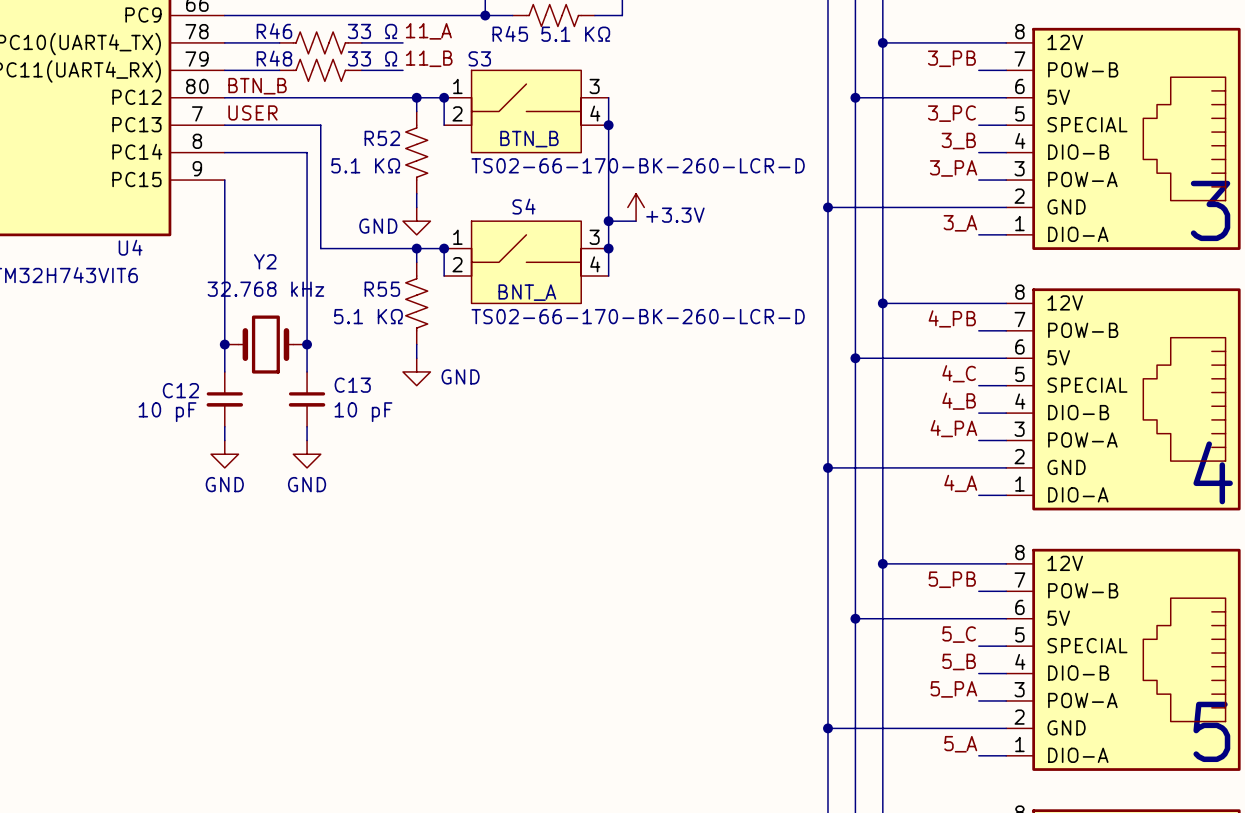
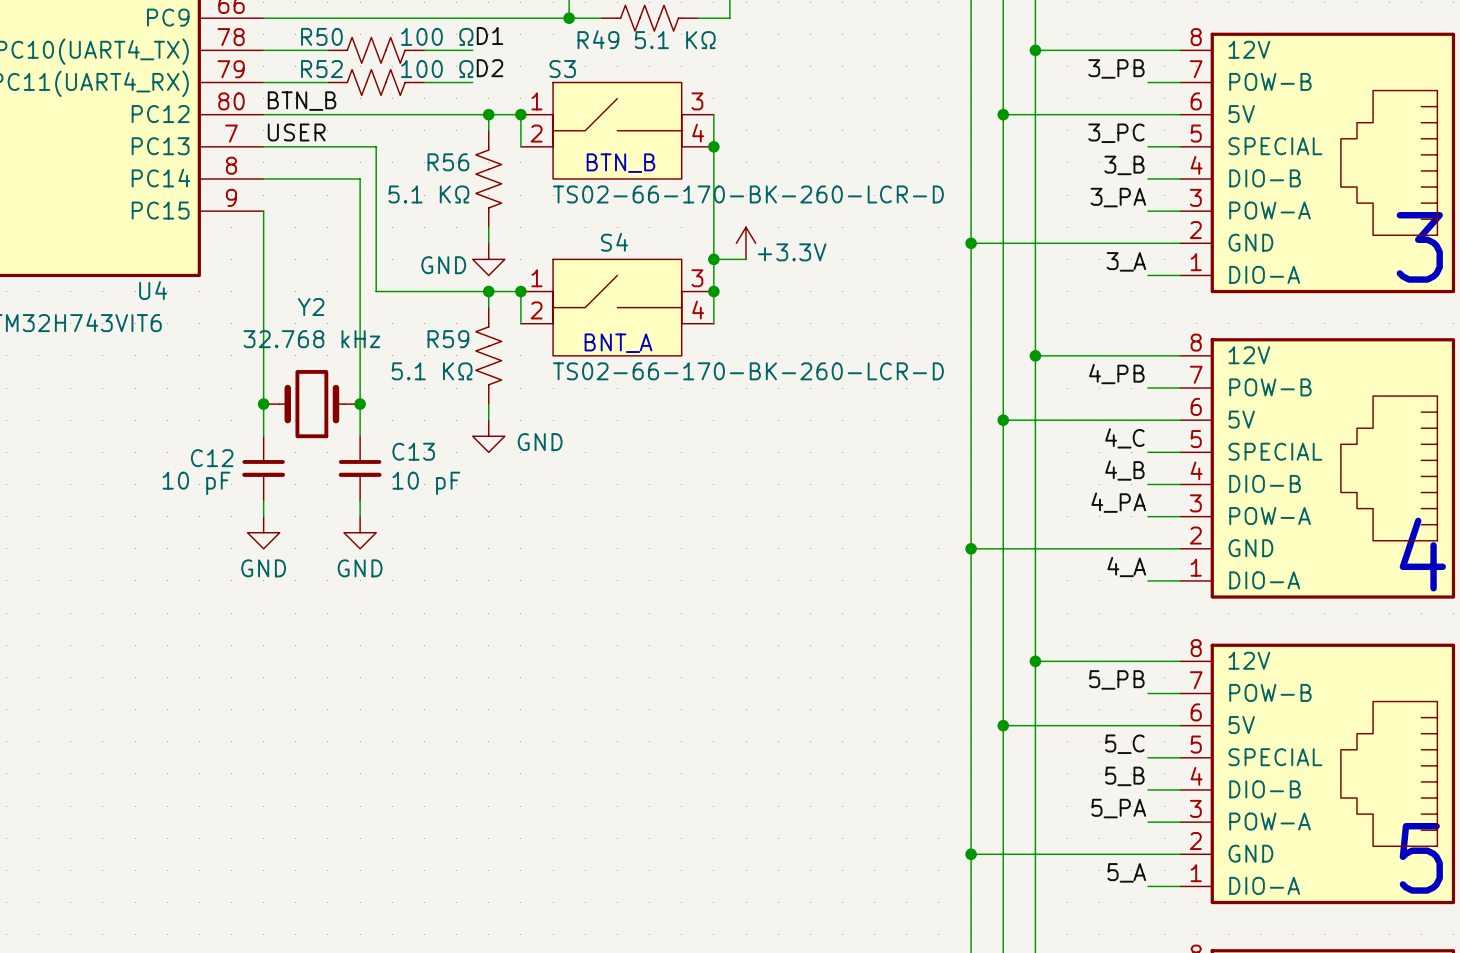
R46 name: R46 (274, 31) -> R50 (321, 36)
R46 value: 33 Ω (372, 31) -> 100 Ω (437, 36)
label: 11_A (428, 31) -> D1 (490, 36)
R45 name: R45 (510, 33) -> R49 (598, 39)
R48 name: R48 (274, 58) -> R52 (321, 69)
R48 value: 33 Ω (372, 58) -> 100 Ω (437, 69)
label: 11_B (429, 58) -> D2 (490, 68)
R52 name: R52 (382, 138) -> R56 (448, 162)
R55 name: R55 (382, 289) -> R59 (448, 339)

